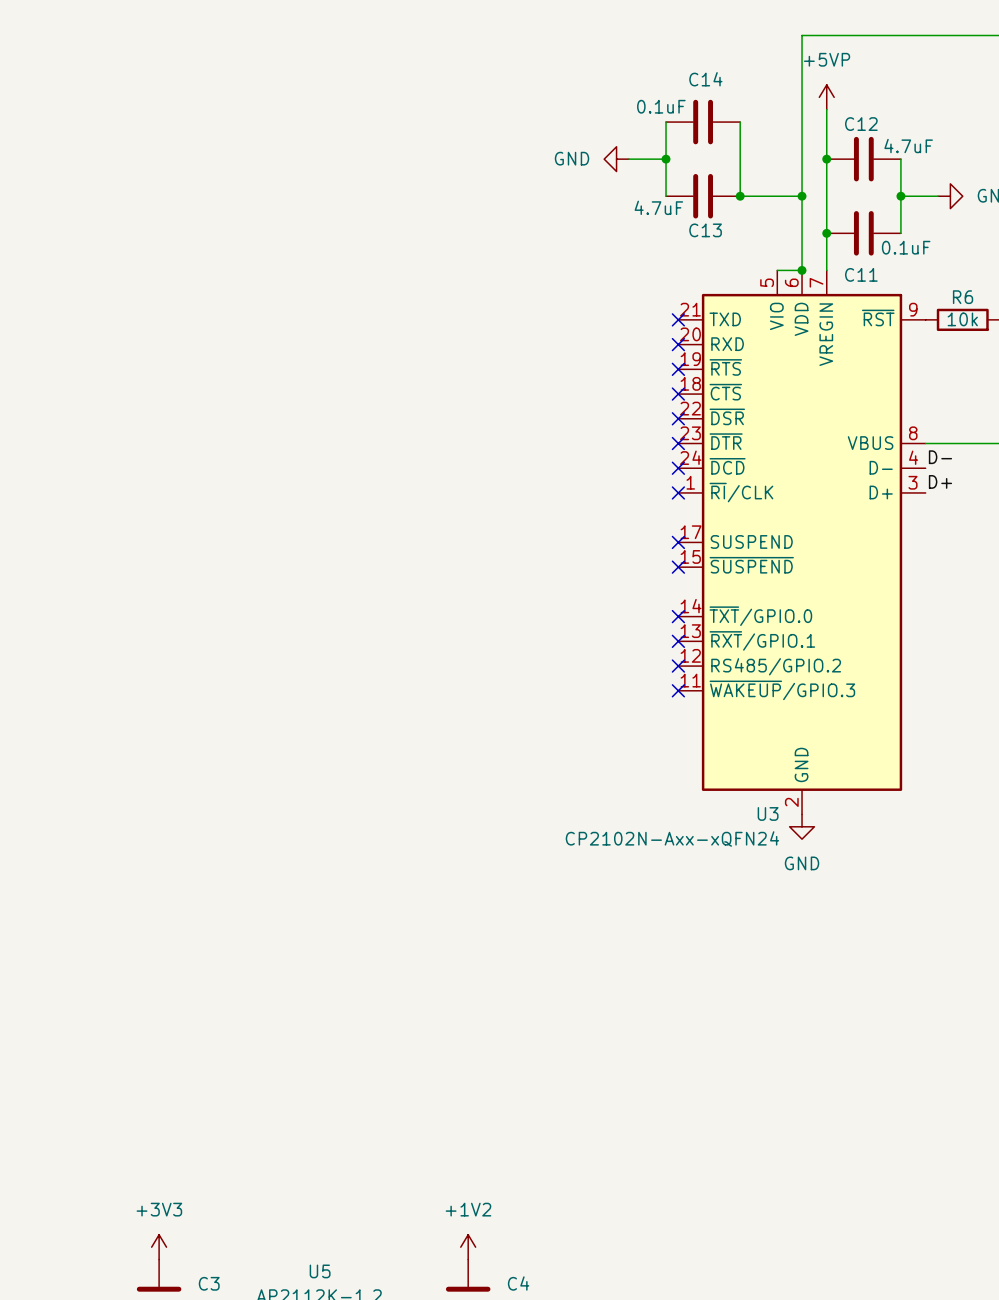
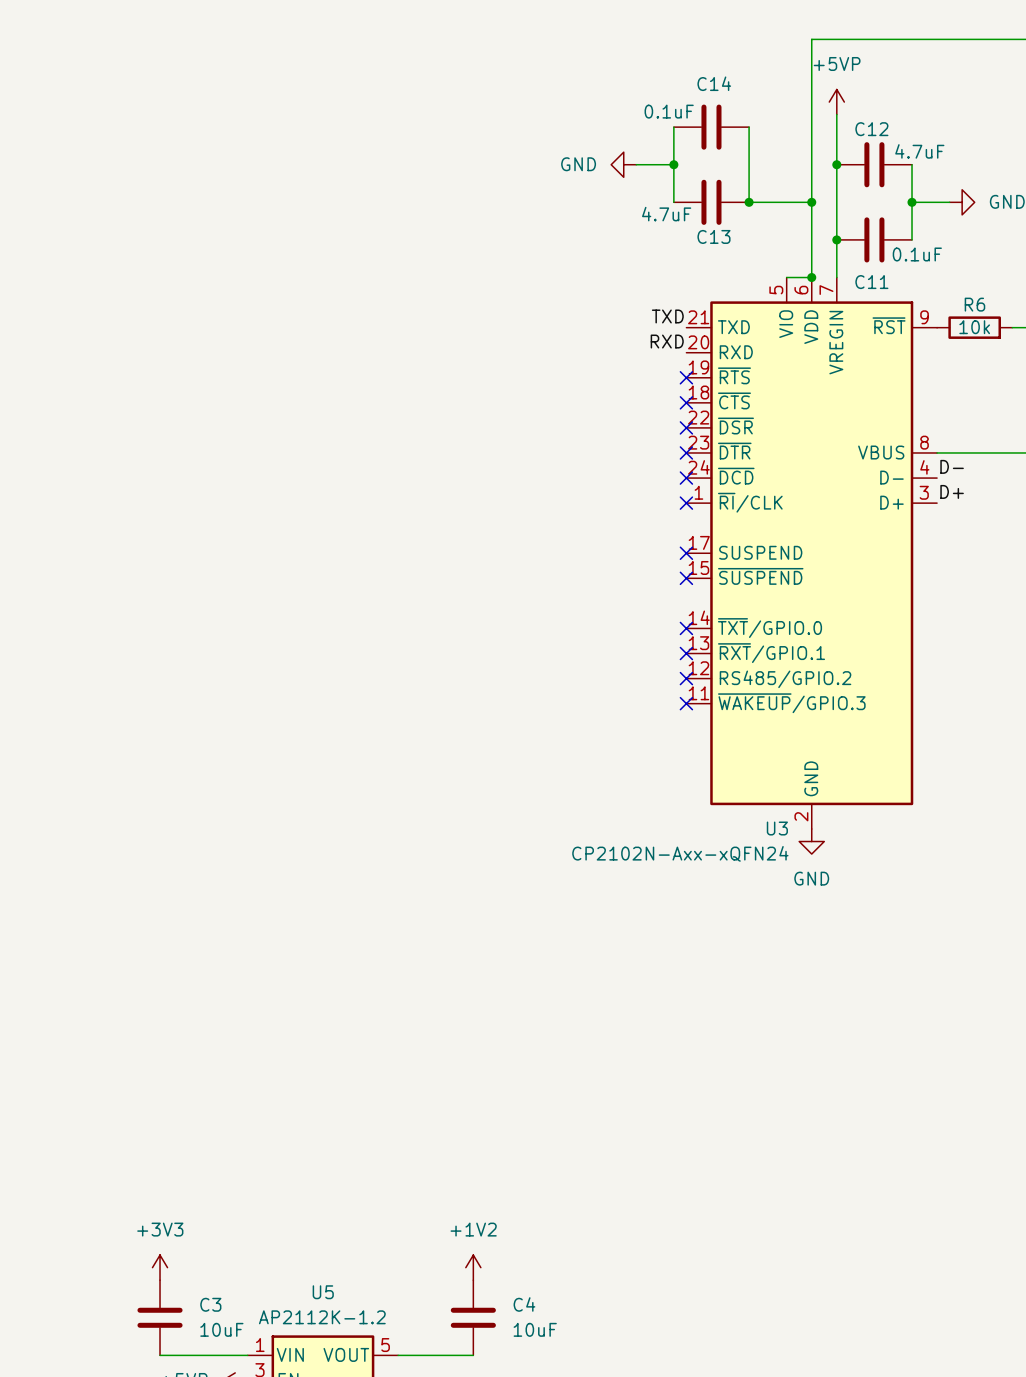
label: none -> TXD (667, 316)
no-connect mark: (678, 319) -> none
label: none -> RXD (667, 341)
no-connect mark: (678, 344) -> none

